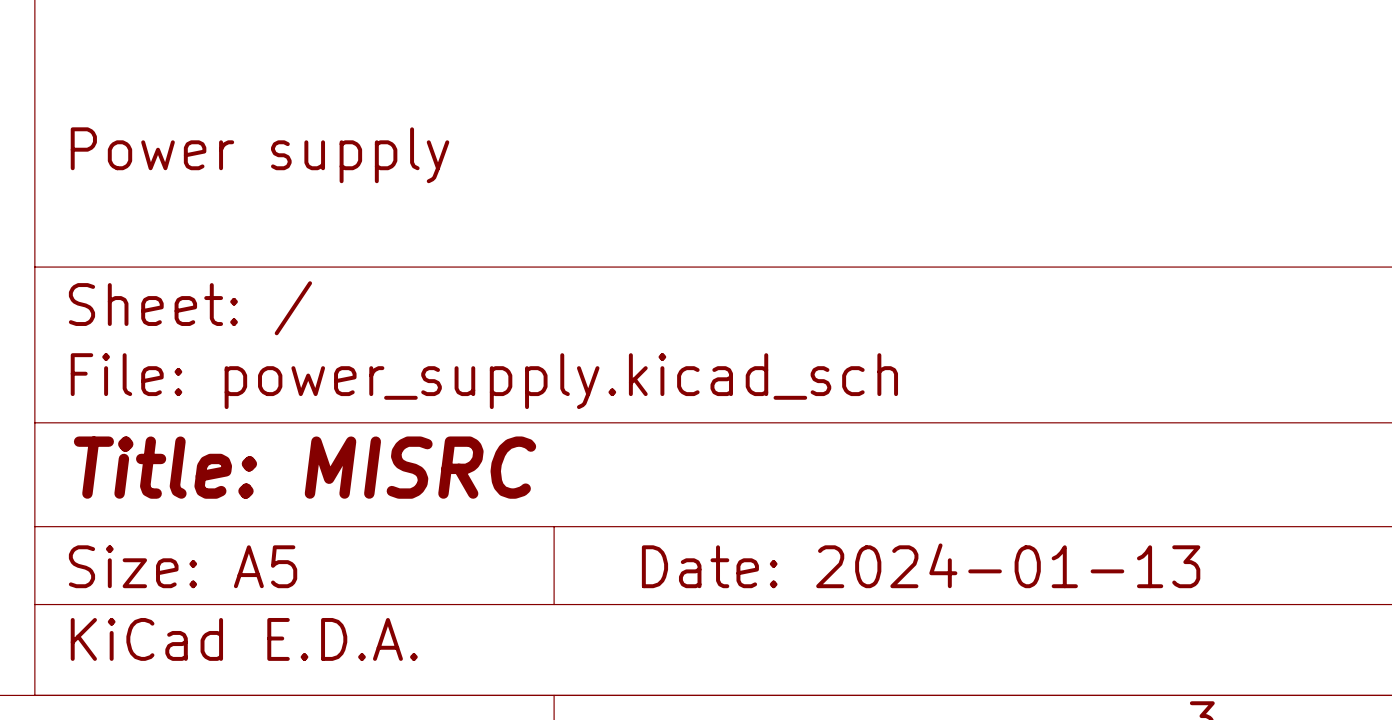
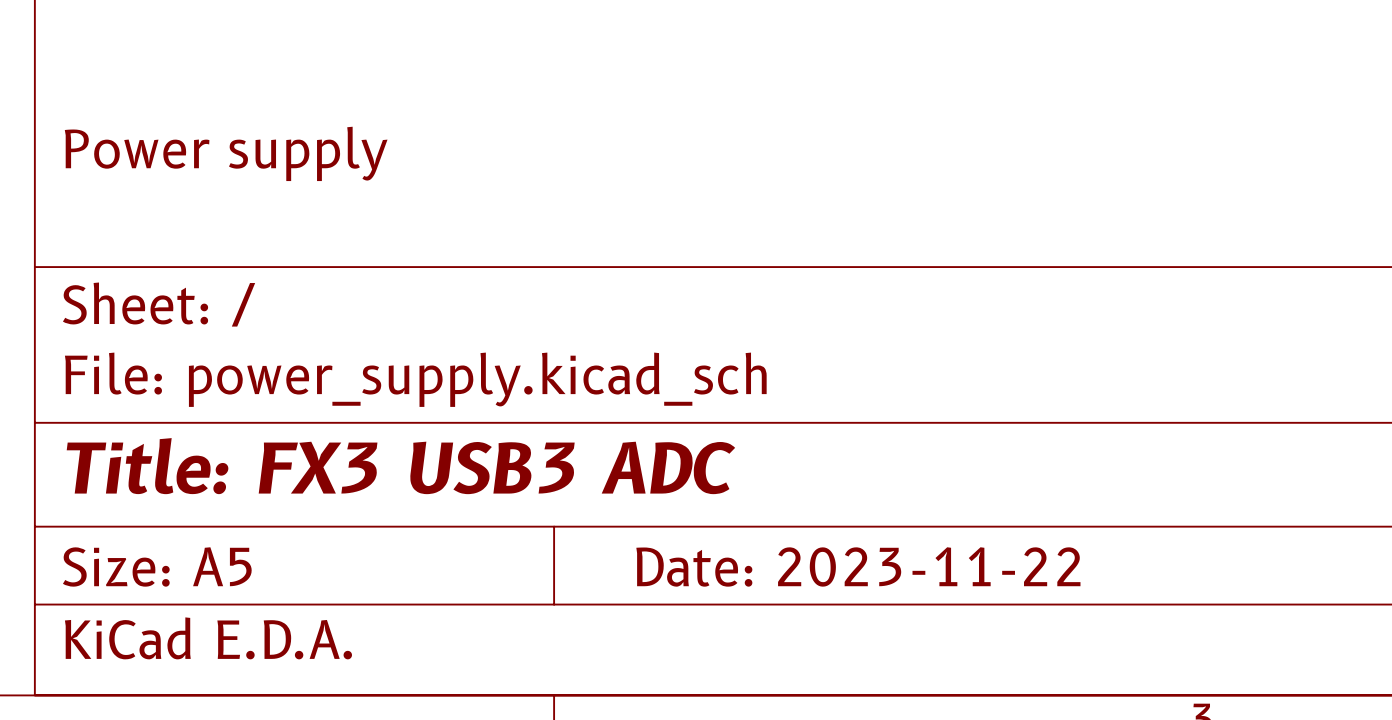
title block: Title: MISRC (305, 467) -> Title: FX3 USB3 ADC (400, 466)
title block: Date: 2024-01-13 (921, 565) -> Date: 2023-11-22 (858, 566)

